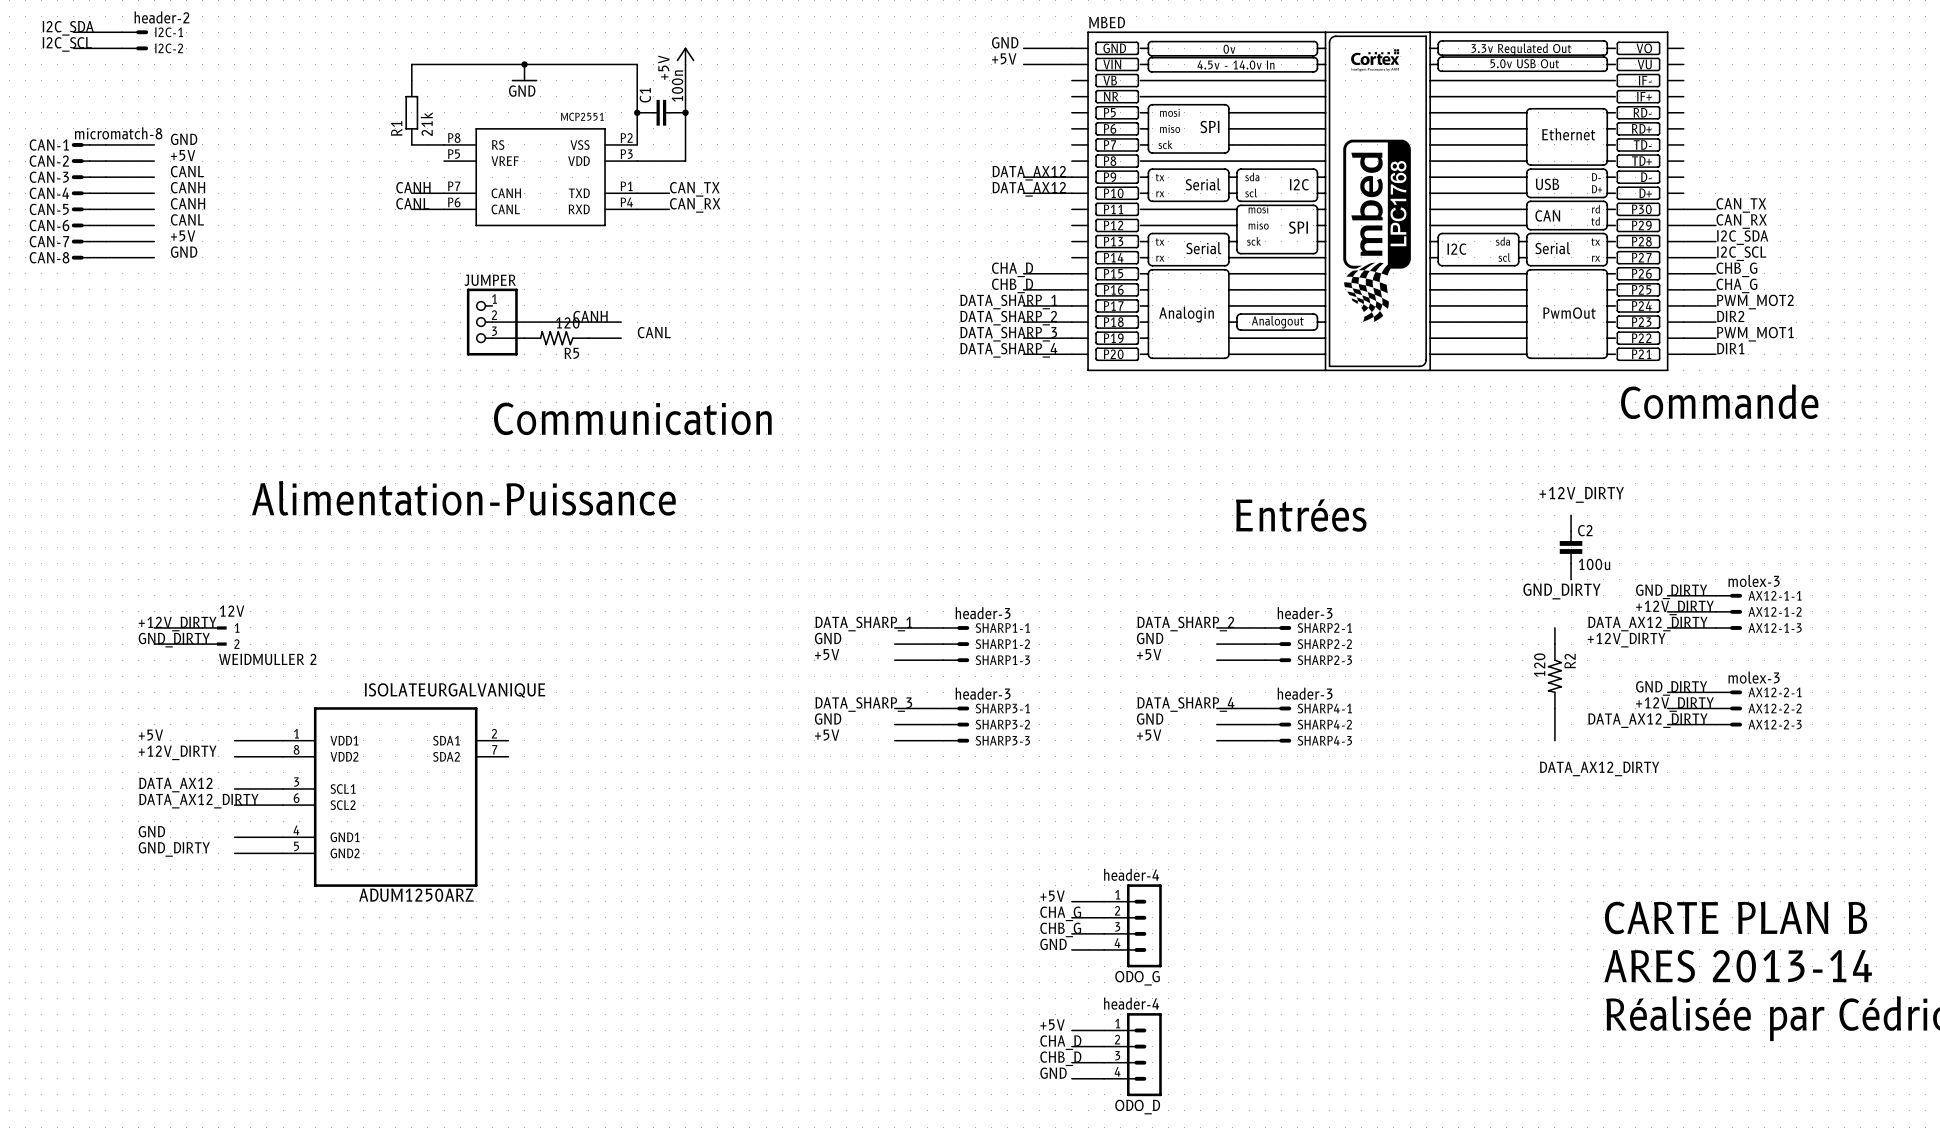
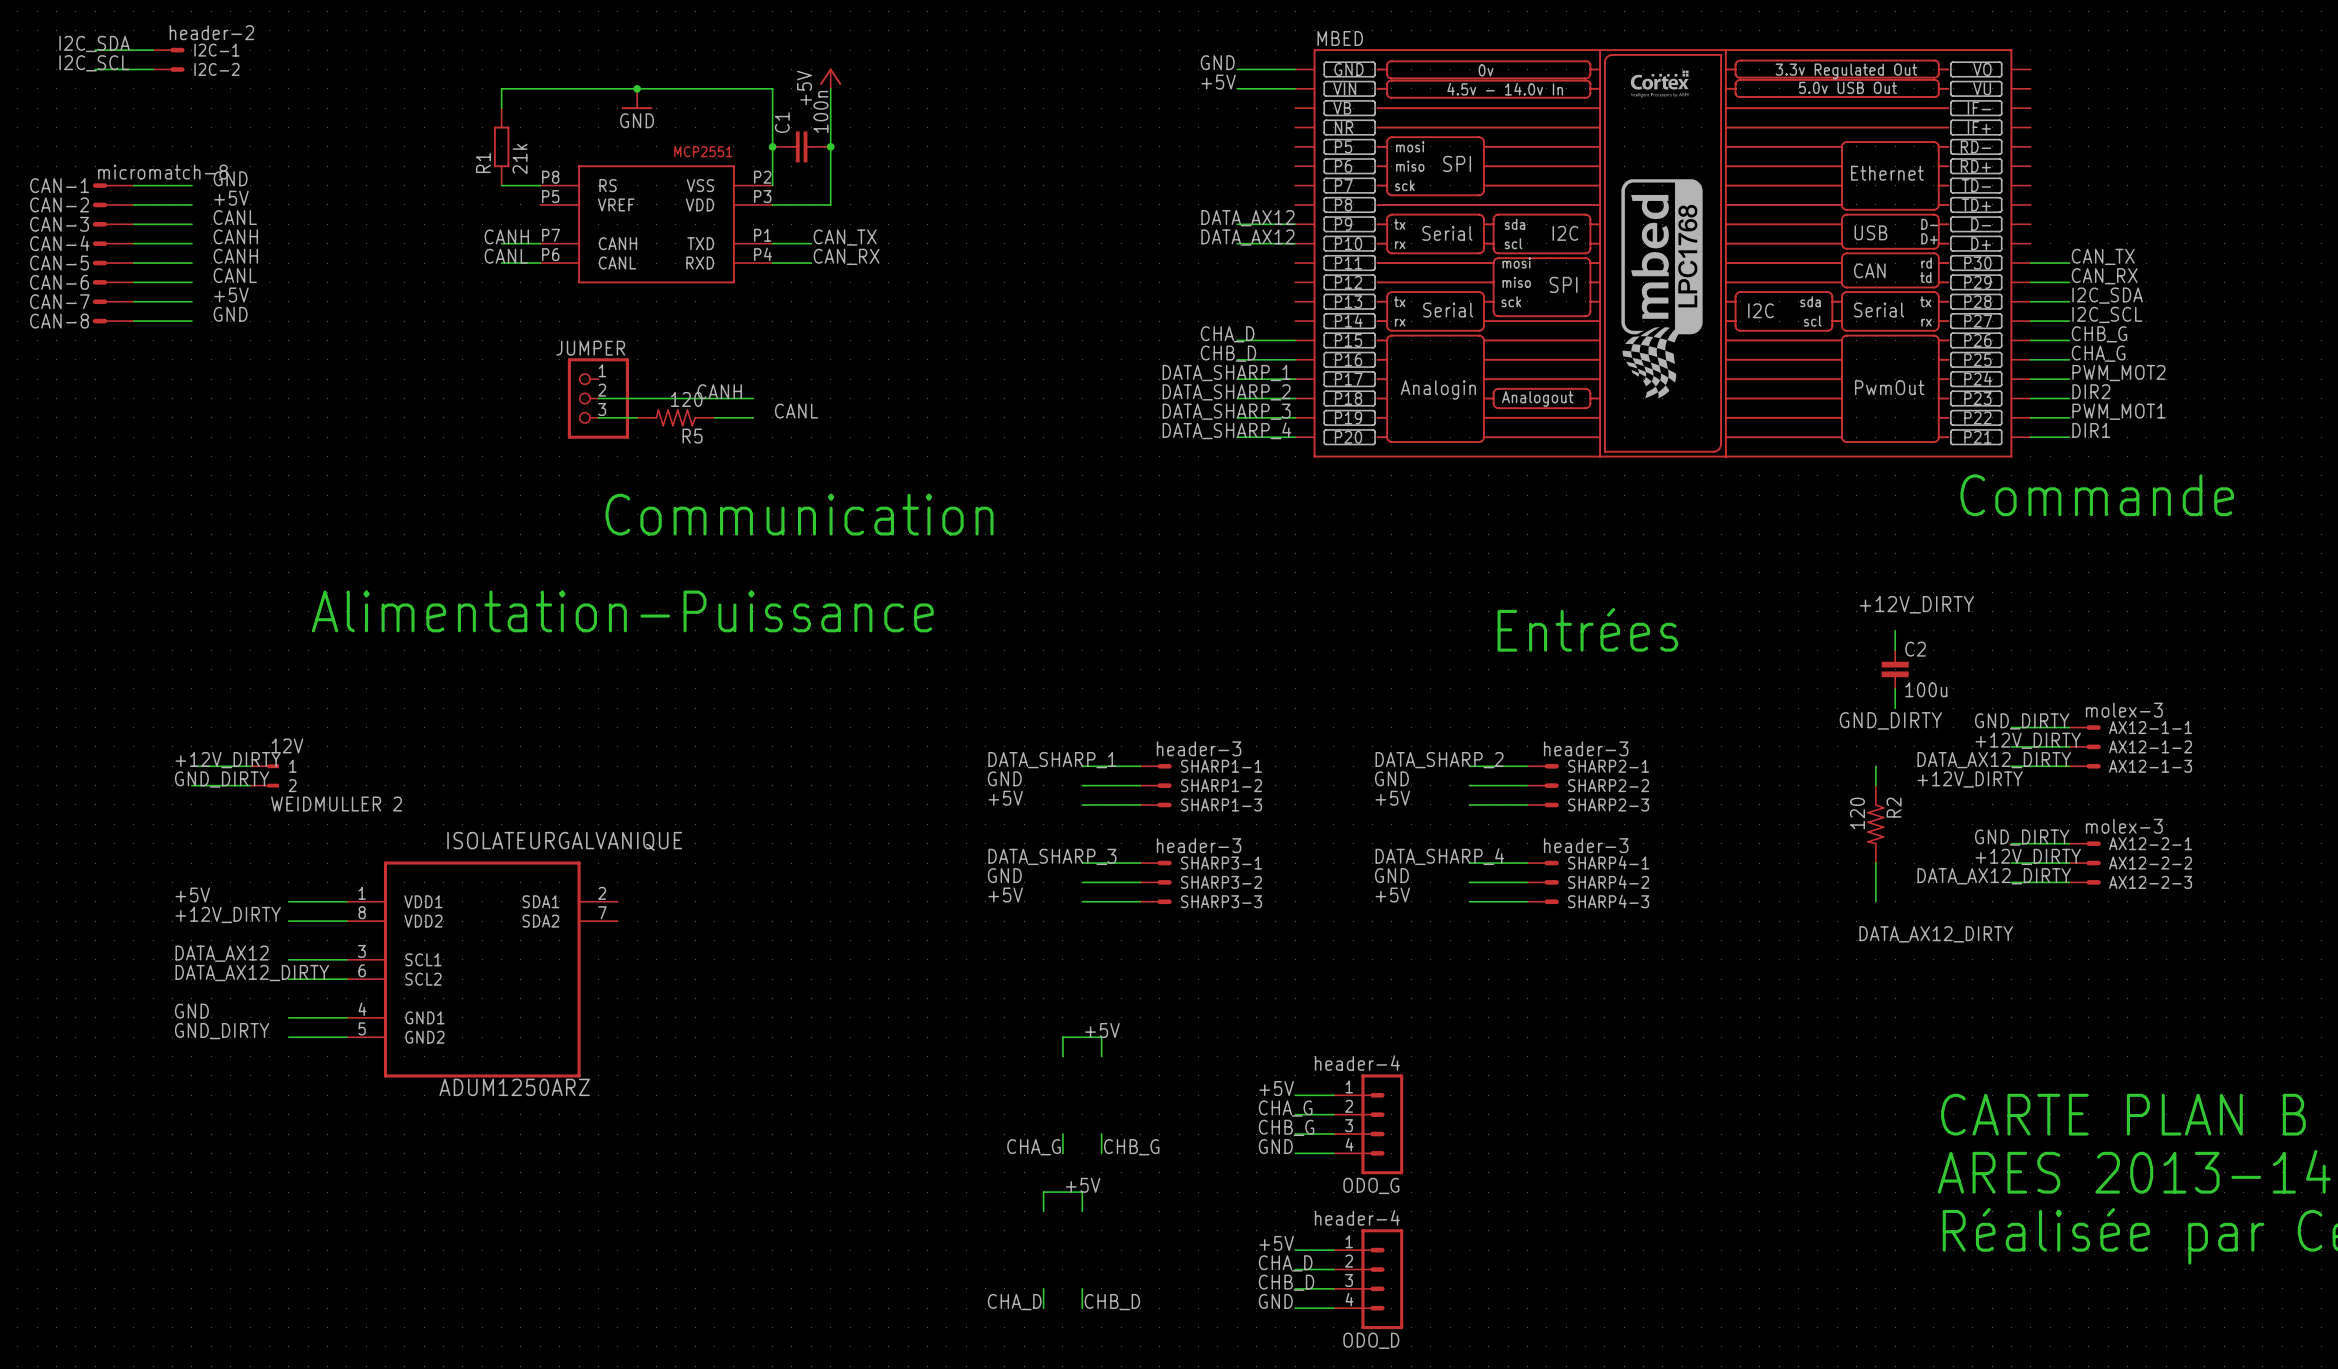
label: none -> +5V (1102, 1030)
wire: none -> (1062, 1056) (1062, 1037) (1101, 1037) (1101, 1056)
wire: none -> (1062, 1134) (1062, 1153)
wire: none -> (1101, 1134) (1101, 1153)
label: none -> CHA_G (1034, 1147)
label: none -> CHB_G (1131, 1147)
label: none -> +5V (1083, 1185)
wire: none -> (1043, 1211) (1043, 1192) (1082, 1192) (1082, 1211)
wire: none -> (1043, 1288) (1043, 1308)
wire: none -> (1082, 1288) (1082, 1308)
label: none -> CHA_D (1014, 1302)
label: none -> CHB_D (1112, 1302)

